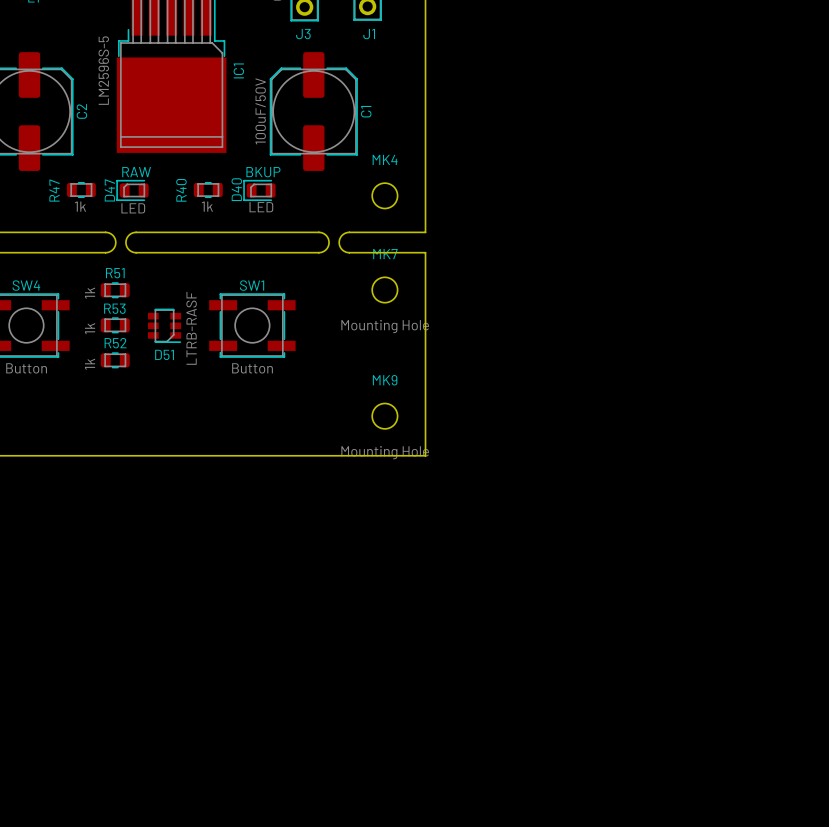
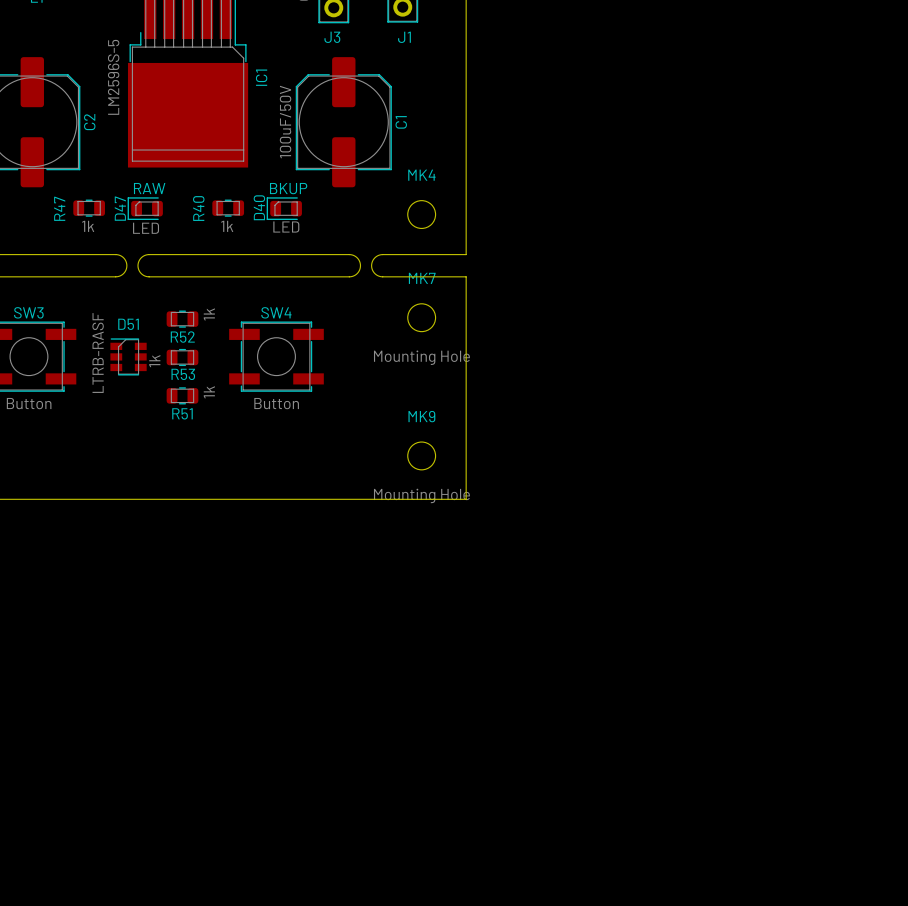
R51 name position: R51 (115, 273) -> R51 (182, 413)
SW4 name: SW4 (26, 285) -> SW3 (28, 312)
SW1 name: SW1 (252, 285) -> SW4 (276, 312)
R51 position: (115, 290) -> (182, 395)
R51 value position: 1k (90, 293) -> 1k (209, 392)
R53 name position: R53 (114, 308) -> R53 (183, 374)
R53 position: (115, 325) -> (182, 357)
D51 rotation: 0° (164, 325) -> 180° (128, 356)
D51 position: (164, 325) -> (128, 356)
R52 name position: R52 (115, 343) -> R52 (182, 337)
R52 position: (115, 360) -> (182, 319)
R52 value position: 1k (90, 364) -> 1k (209, 314)

